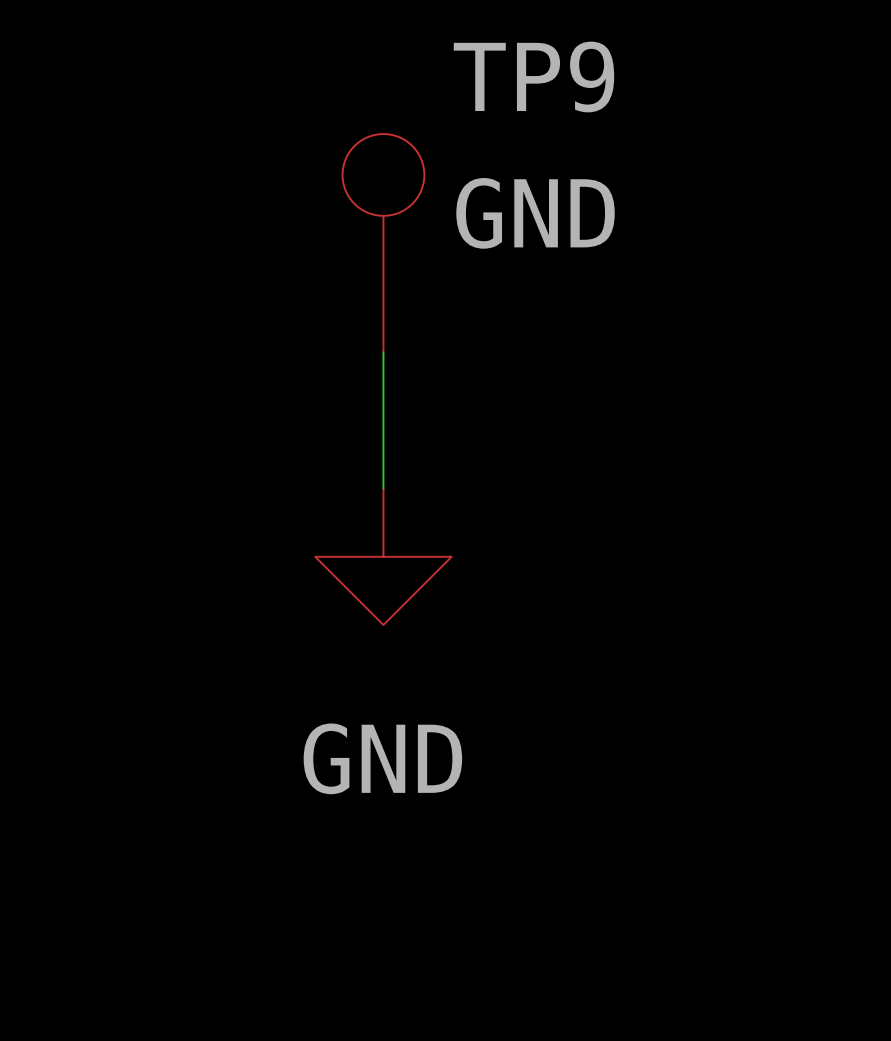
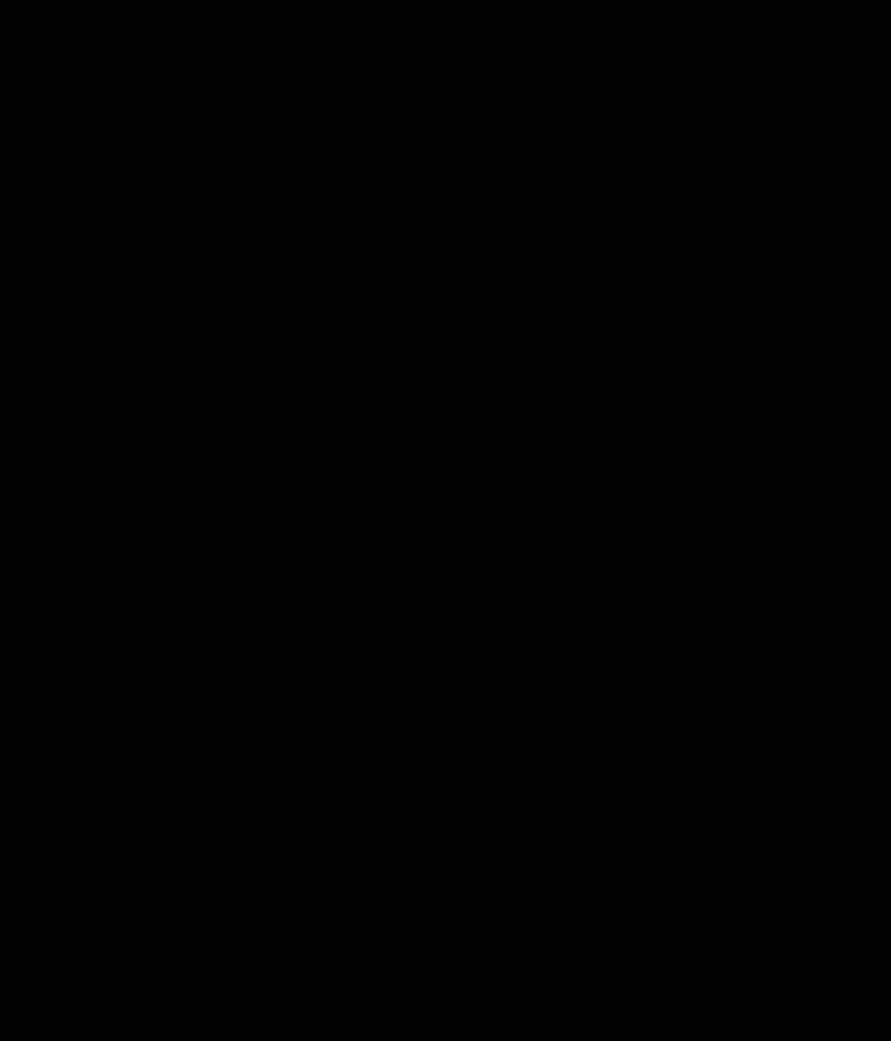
TP9: GND (383, 243) -> none
wire: (383, 352) (383, 488) -> none
power symbol: GND (383, 556) -> none

